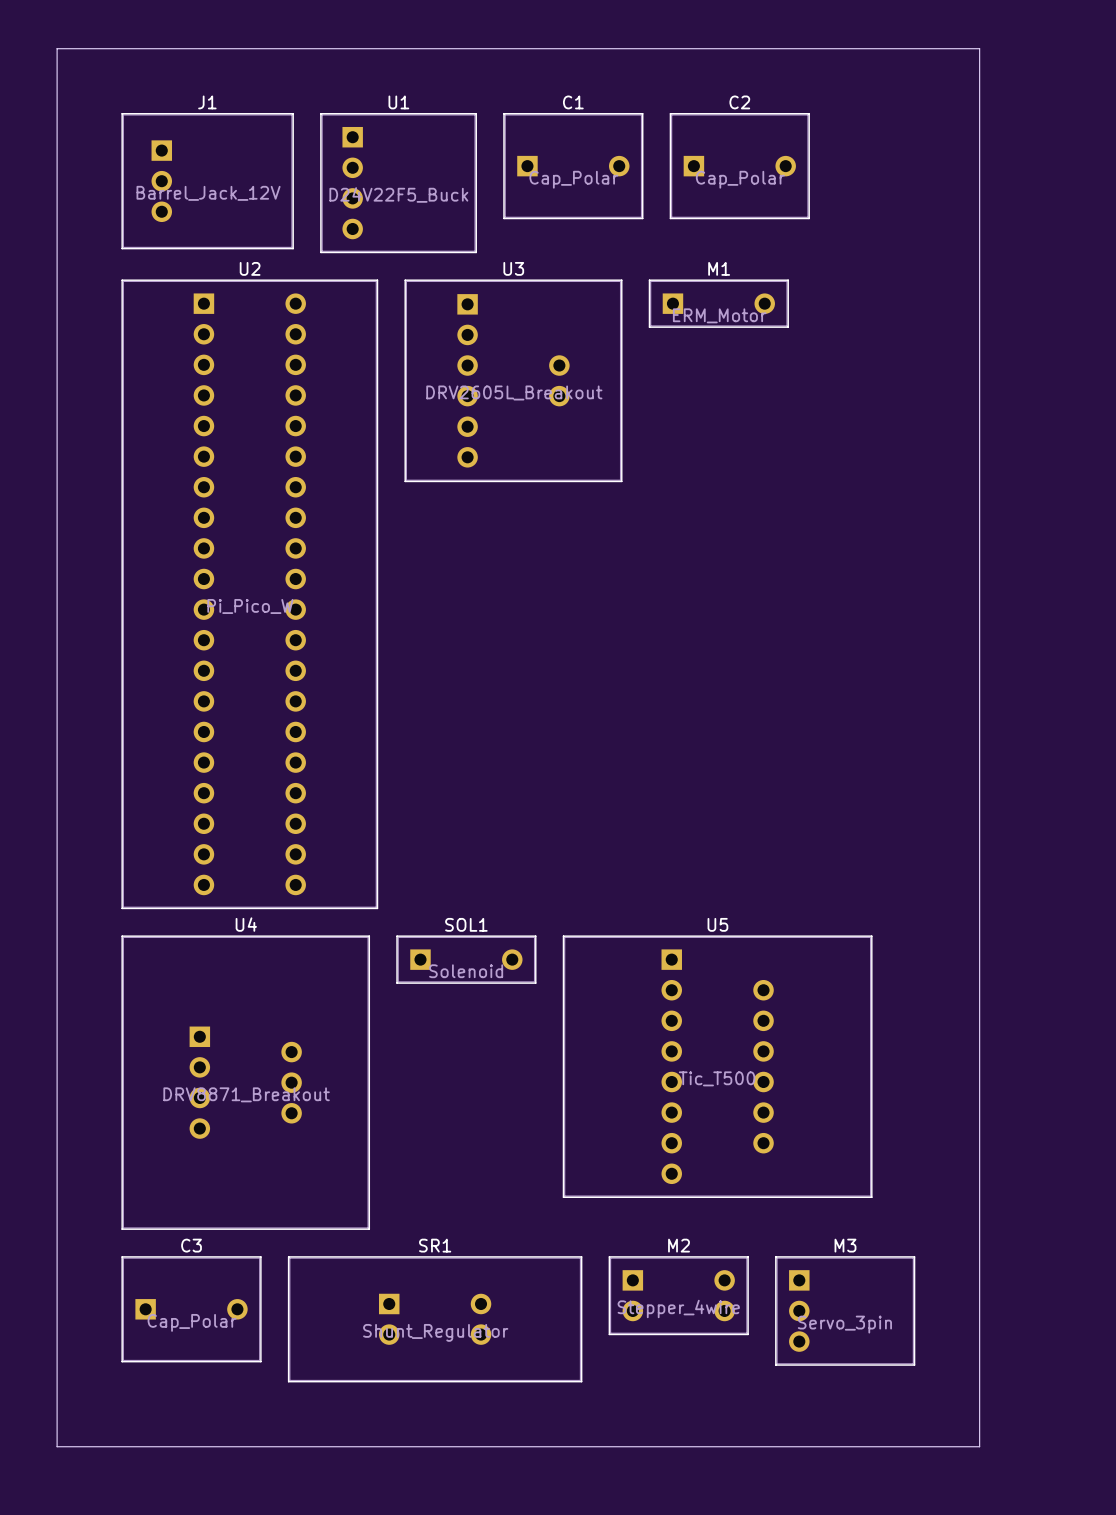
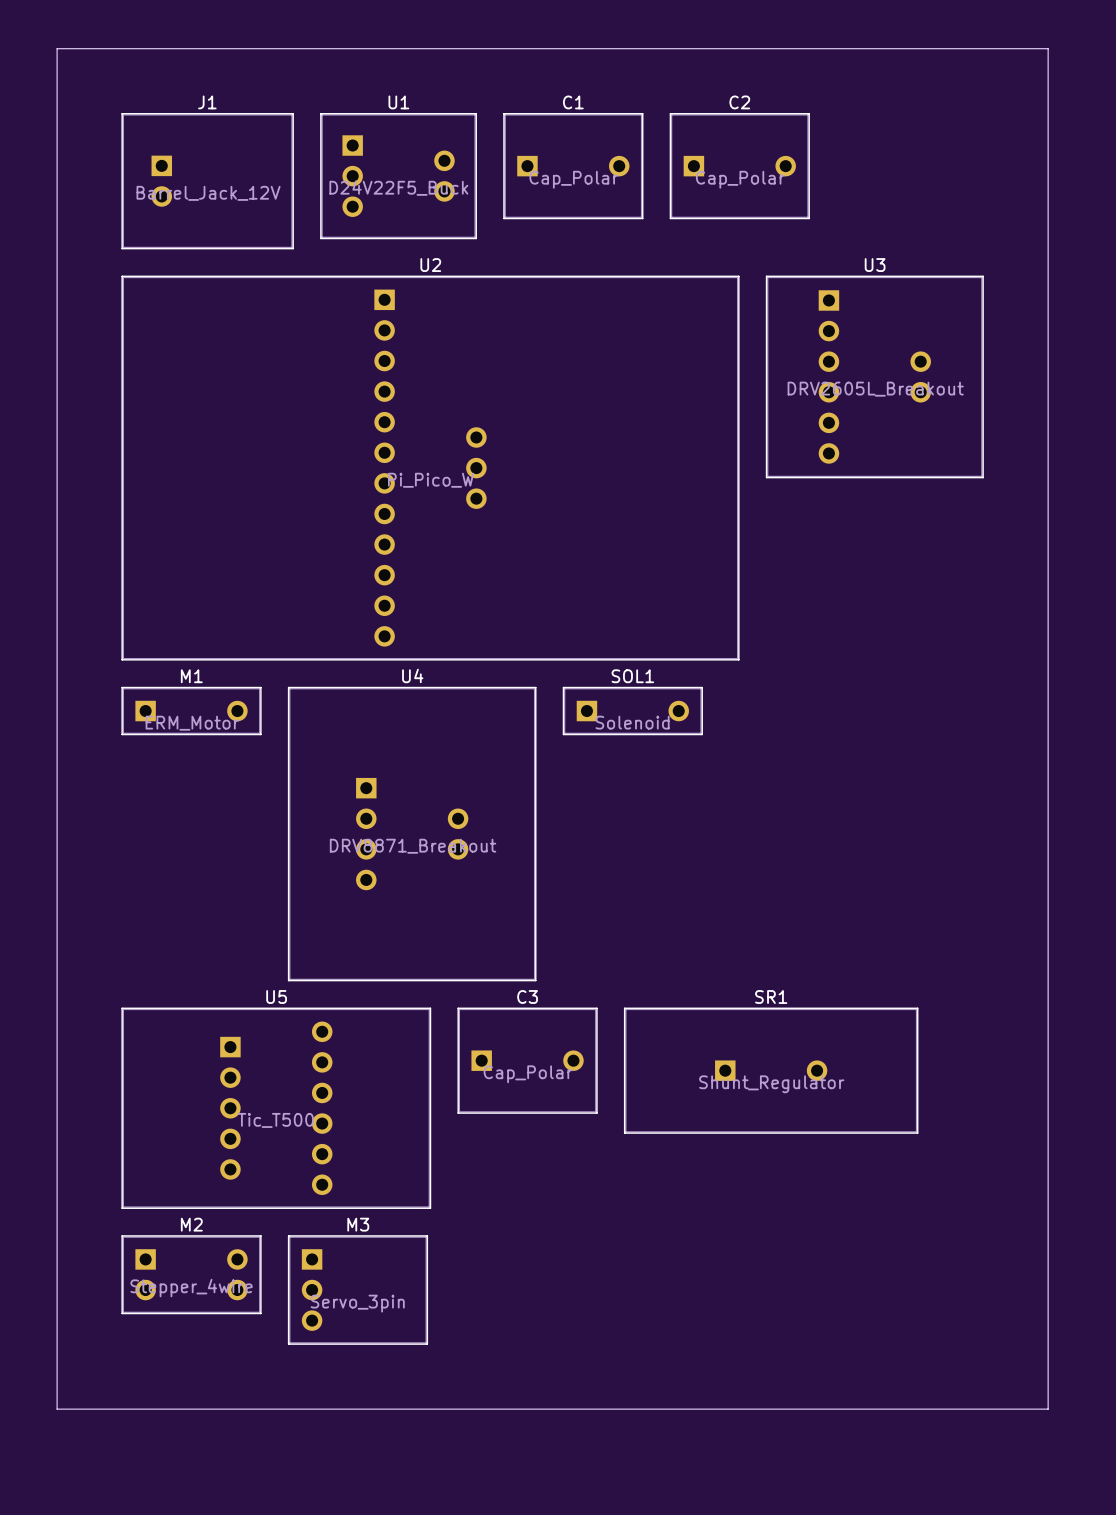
board edge: (979, 48) (979, 1446) (57, 1446) (57, 1409) -> (979, 48) (1048, 48) (1048, 1409) (57, 1409)
J1 footprint: [121, 113, 294, 250] -> [121, 113, 294, 250]
U1 footprint: [320, 113, 477, 254] -> [320, 113, 477, 240]
U2 name position: U2 (250, 268) -> U2 (430, 265)
U2 footprint: [121, 279, 379, 910] -> [121, 275, 740, 661]
M1 position: (718, 303) -> (191, 711)
U3 position: (513, 380) -> (874, 376)
U5 name position: U5 (717, 924) -> U5 (276, 997)
U4 footprint: [121, 935, 371, 1230] -> [287, 686, 537, 982]
U5 footprint: [562, 935, 873, 1199] -> [121, 1007, 432, 1209]
SOL1 position: (466, 959) -> (632, 711)
SR1 footprint: [287, 1256, 583, 1383] -> [623, 1007, 919, 1134]
M2 position: (678, 1295) -> (191, 1274)
C3 position: (191, 1309) -> (527, 1060)
M3 position: (845, 1310) -> (357, 1290)

